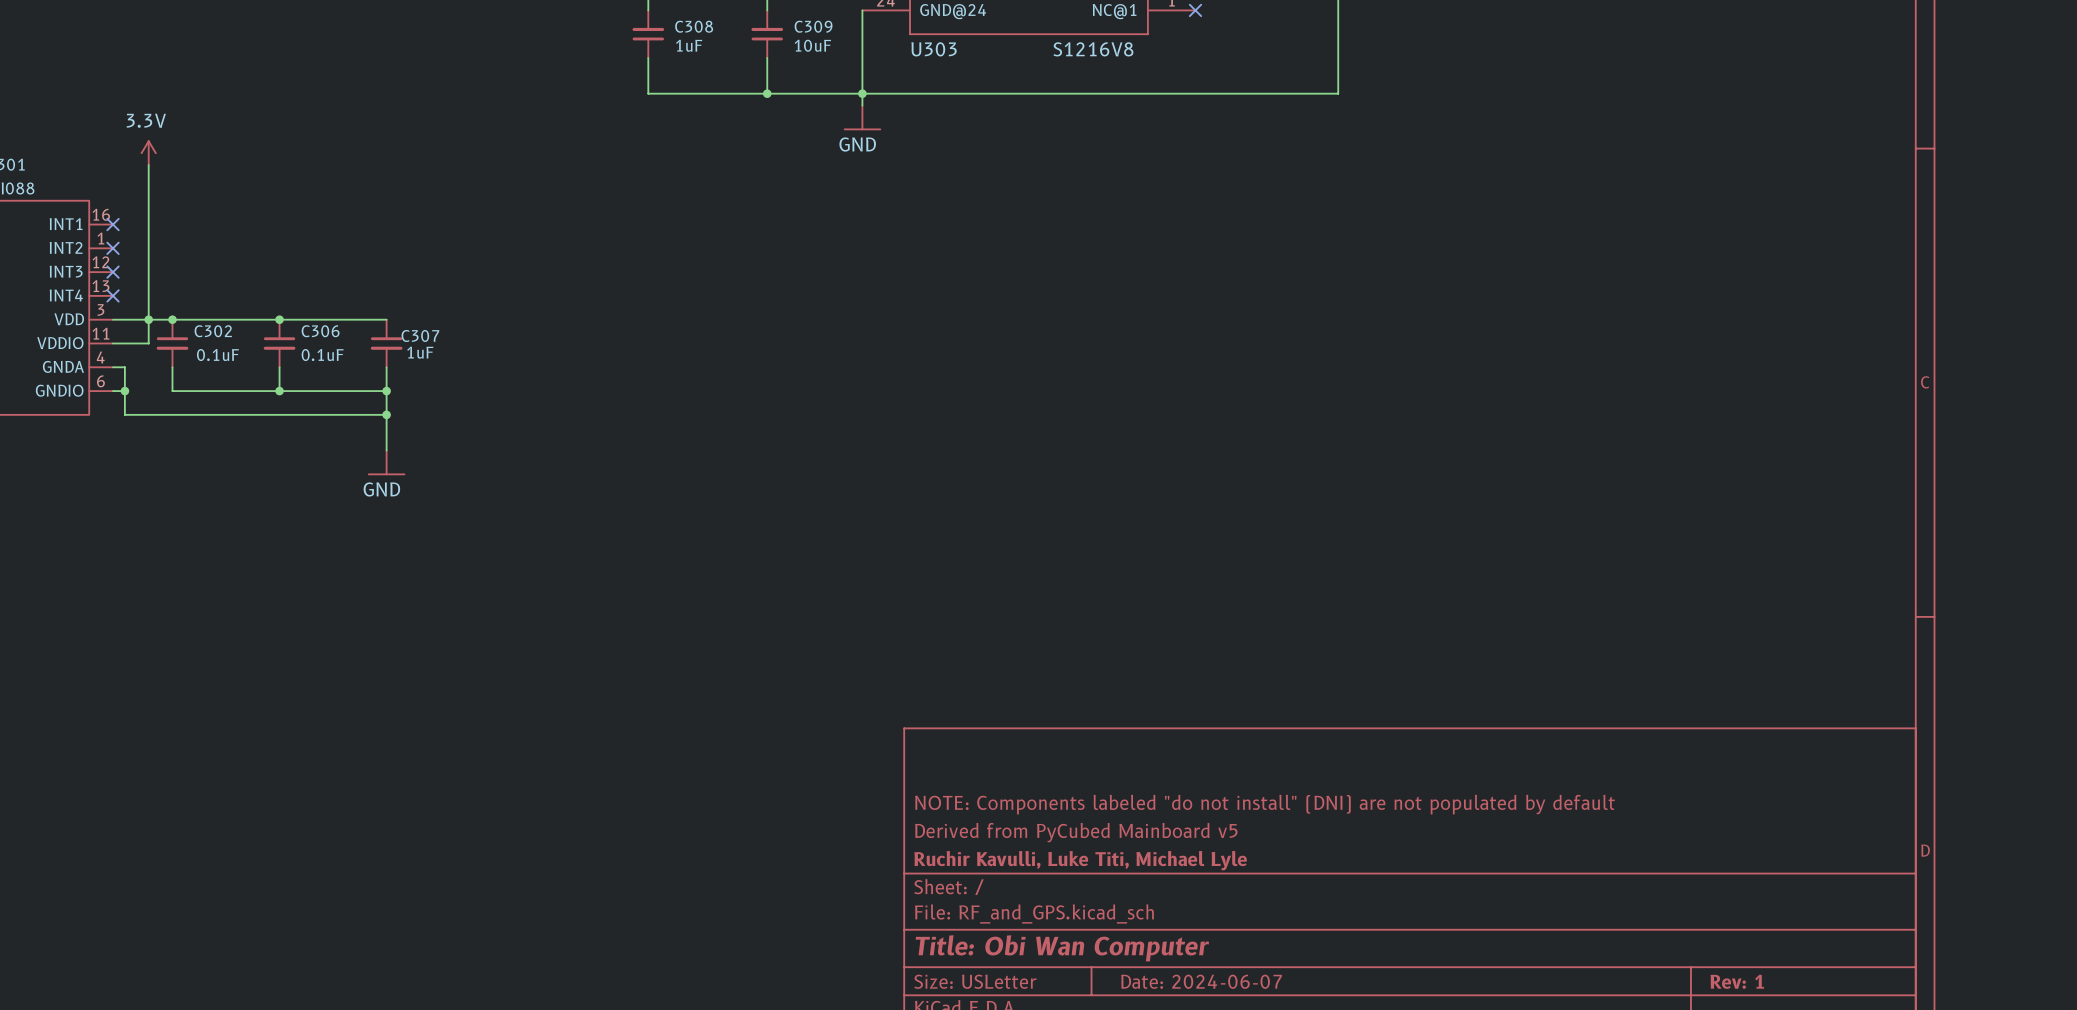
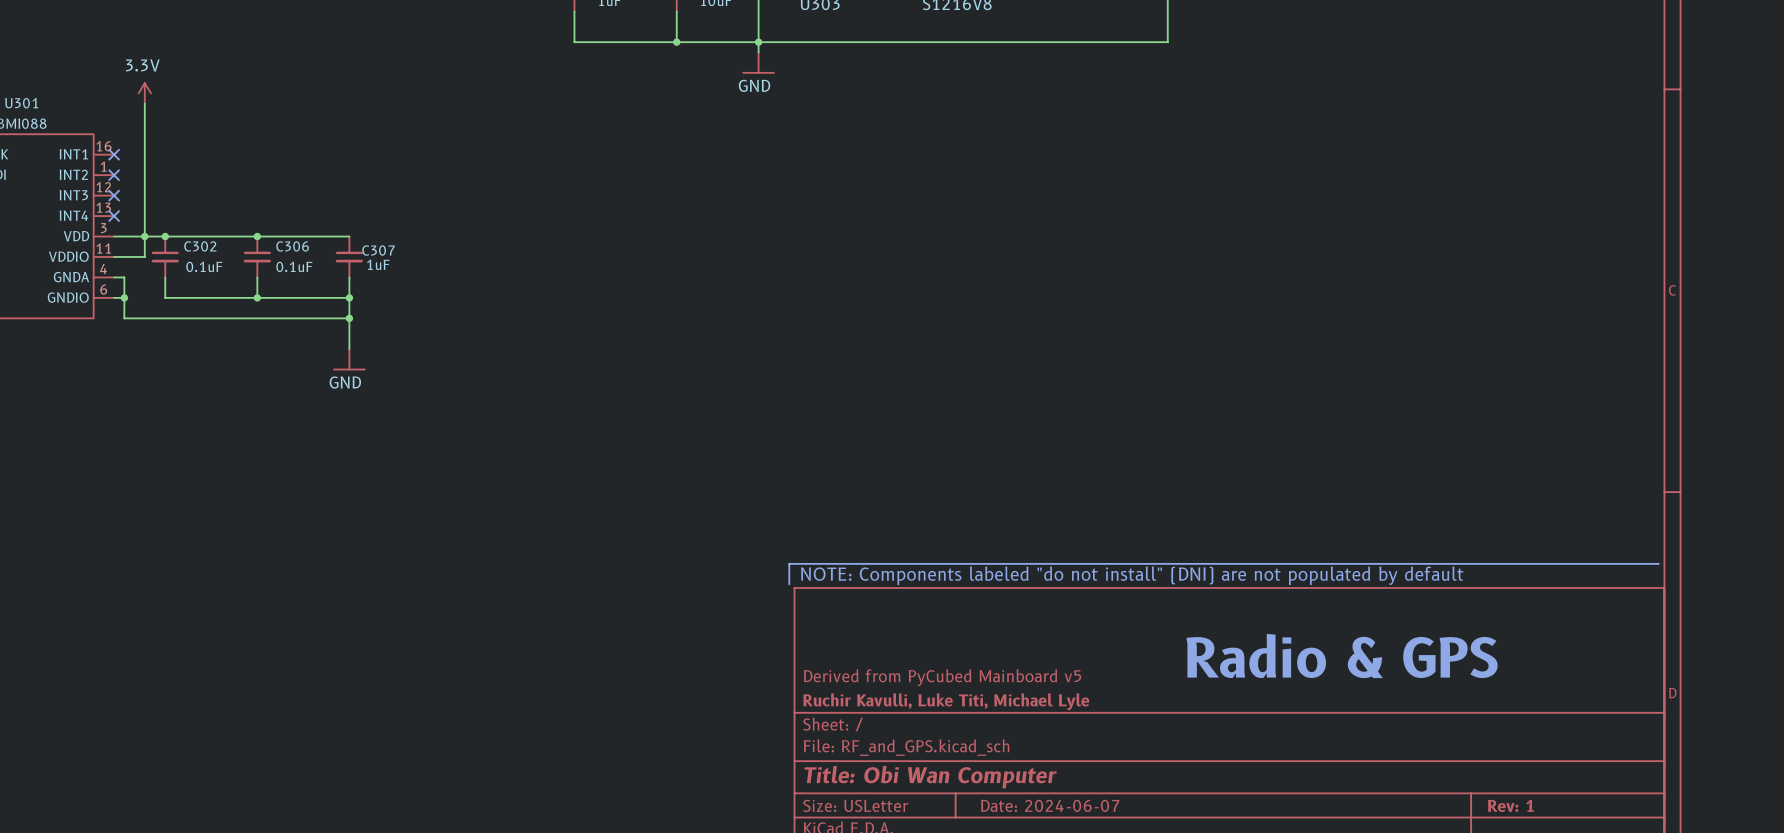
line: none -> (1658, 563) (789, 563) (789, 584)
text: none -> NOTE: Components labeled "do not install" (DNI) are not populated by default (1132, 575)
title block: NOTE: Components labeled "do not install" (DNI) are not populated by default (1265, 804) -> none
text: none -> Radio & GPS (1342, 655)

